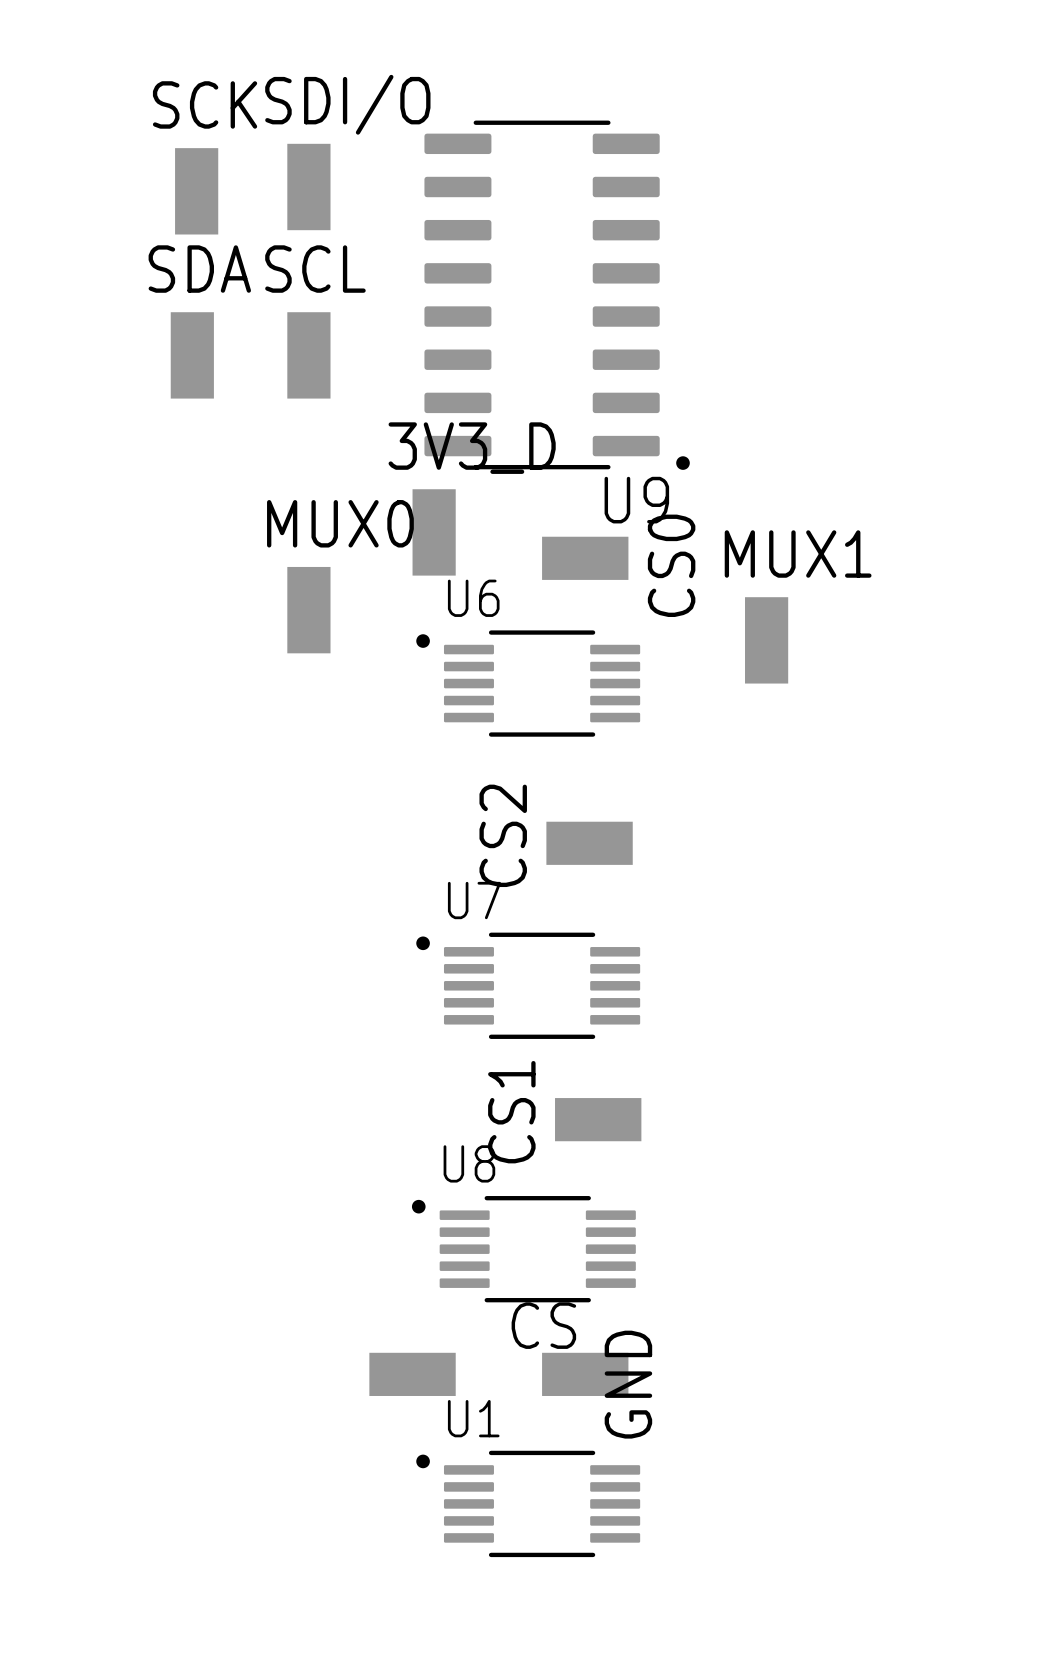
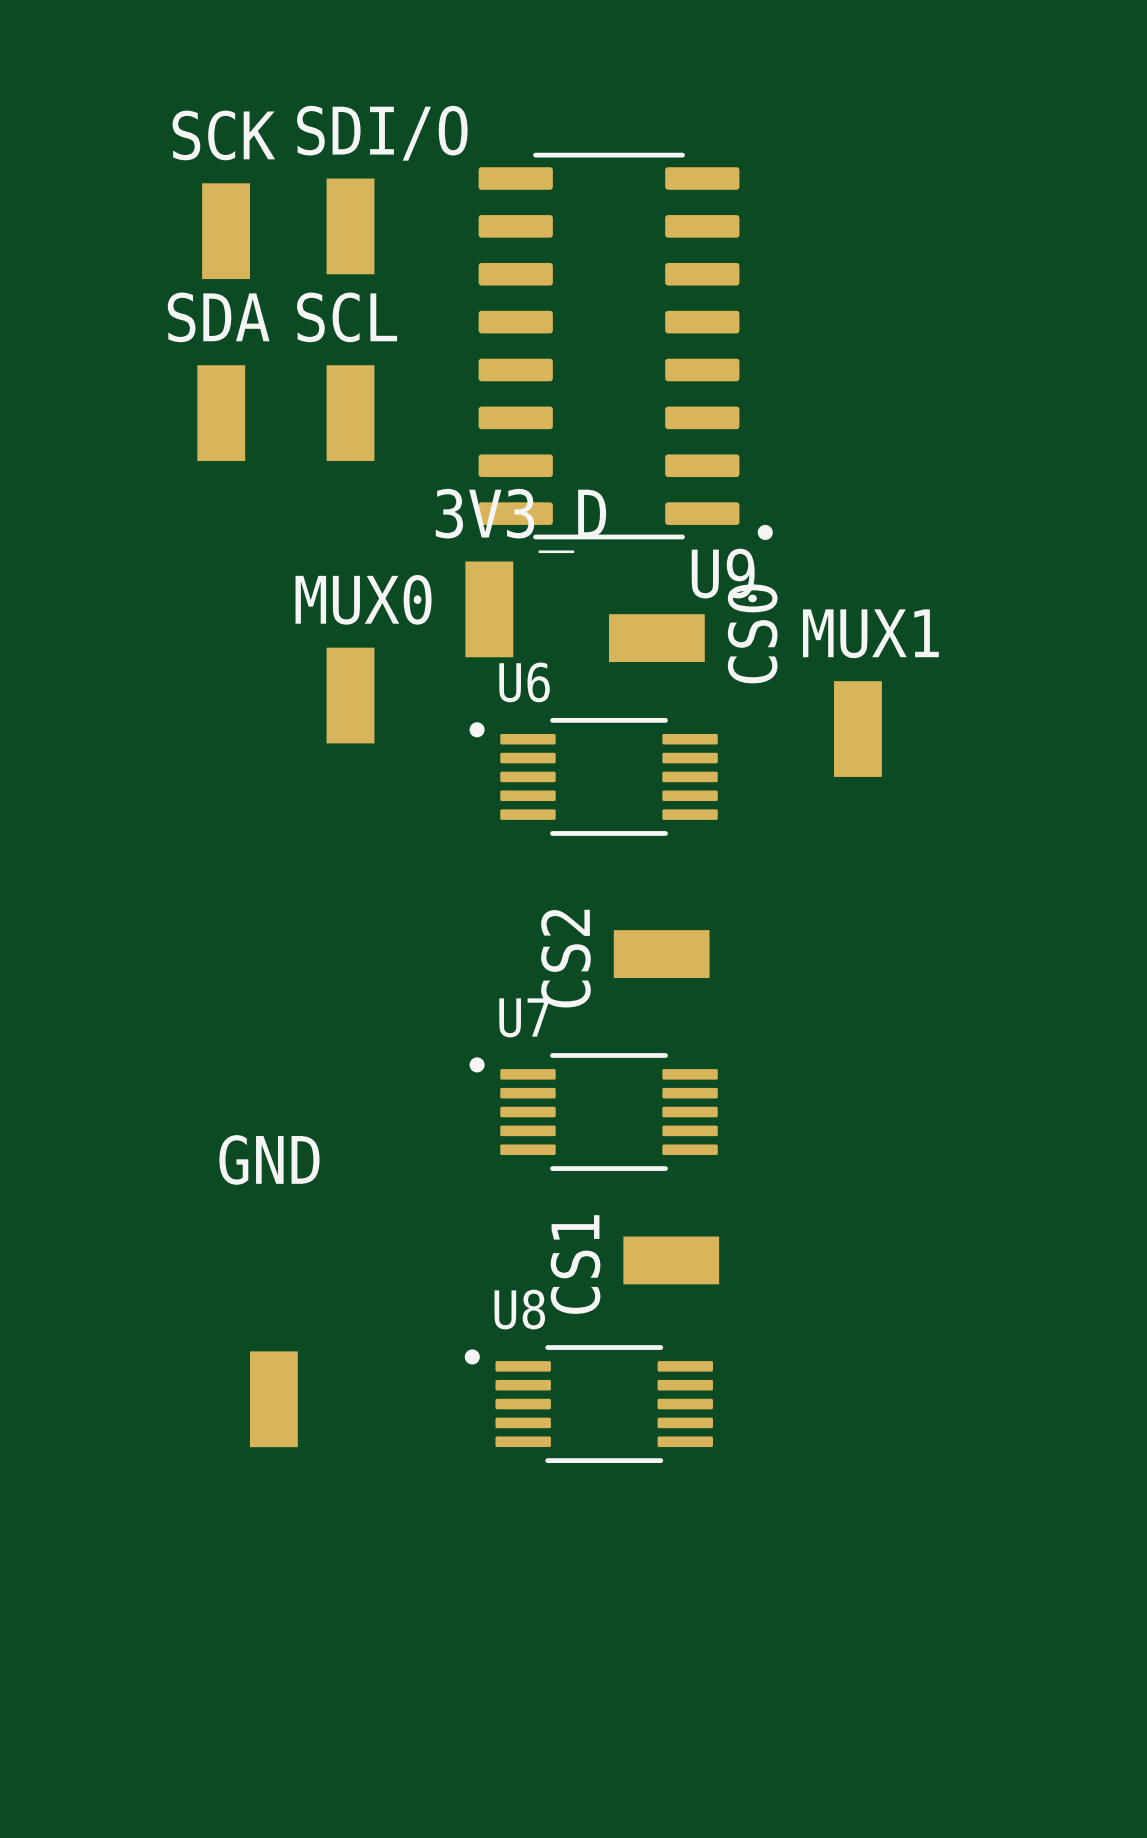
GND rotation: 0° (412, 1374) -> 90° clockwise (273, 1399)
GND position: (412, 1374) -> (273, 1399)
CS: (585, 1374) -> none
GND name position: GND (628, 1384) -> GND (269, 1159)
U1: (528, 1503) -> none

